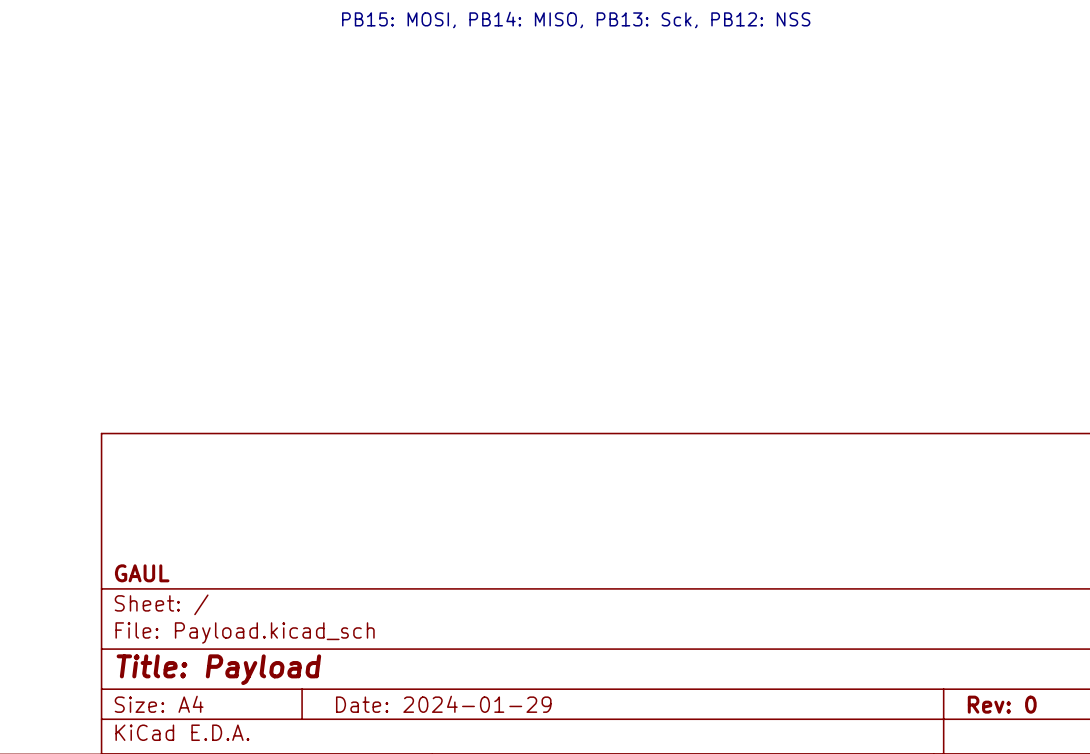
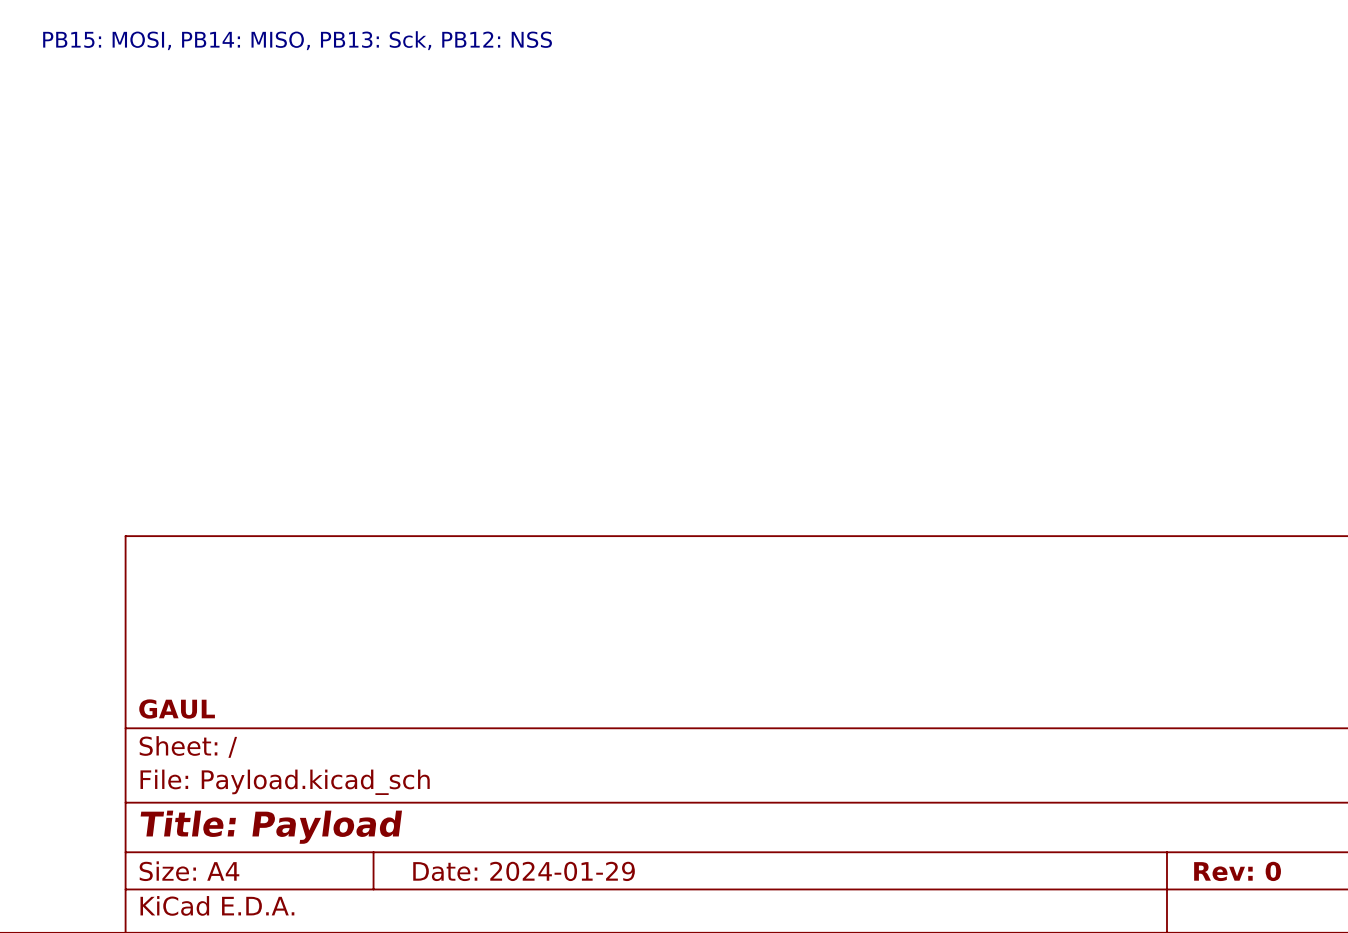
text: PB15: MOSI, PB14: MISO, PB13: Sck, PB12: NSS (576, 20) -> none
text: none -> PB15: MOSI, PB14: MISO, PB13: Sck, PB12: NSS (297, 40)

